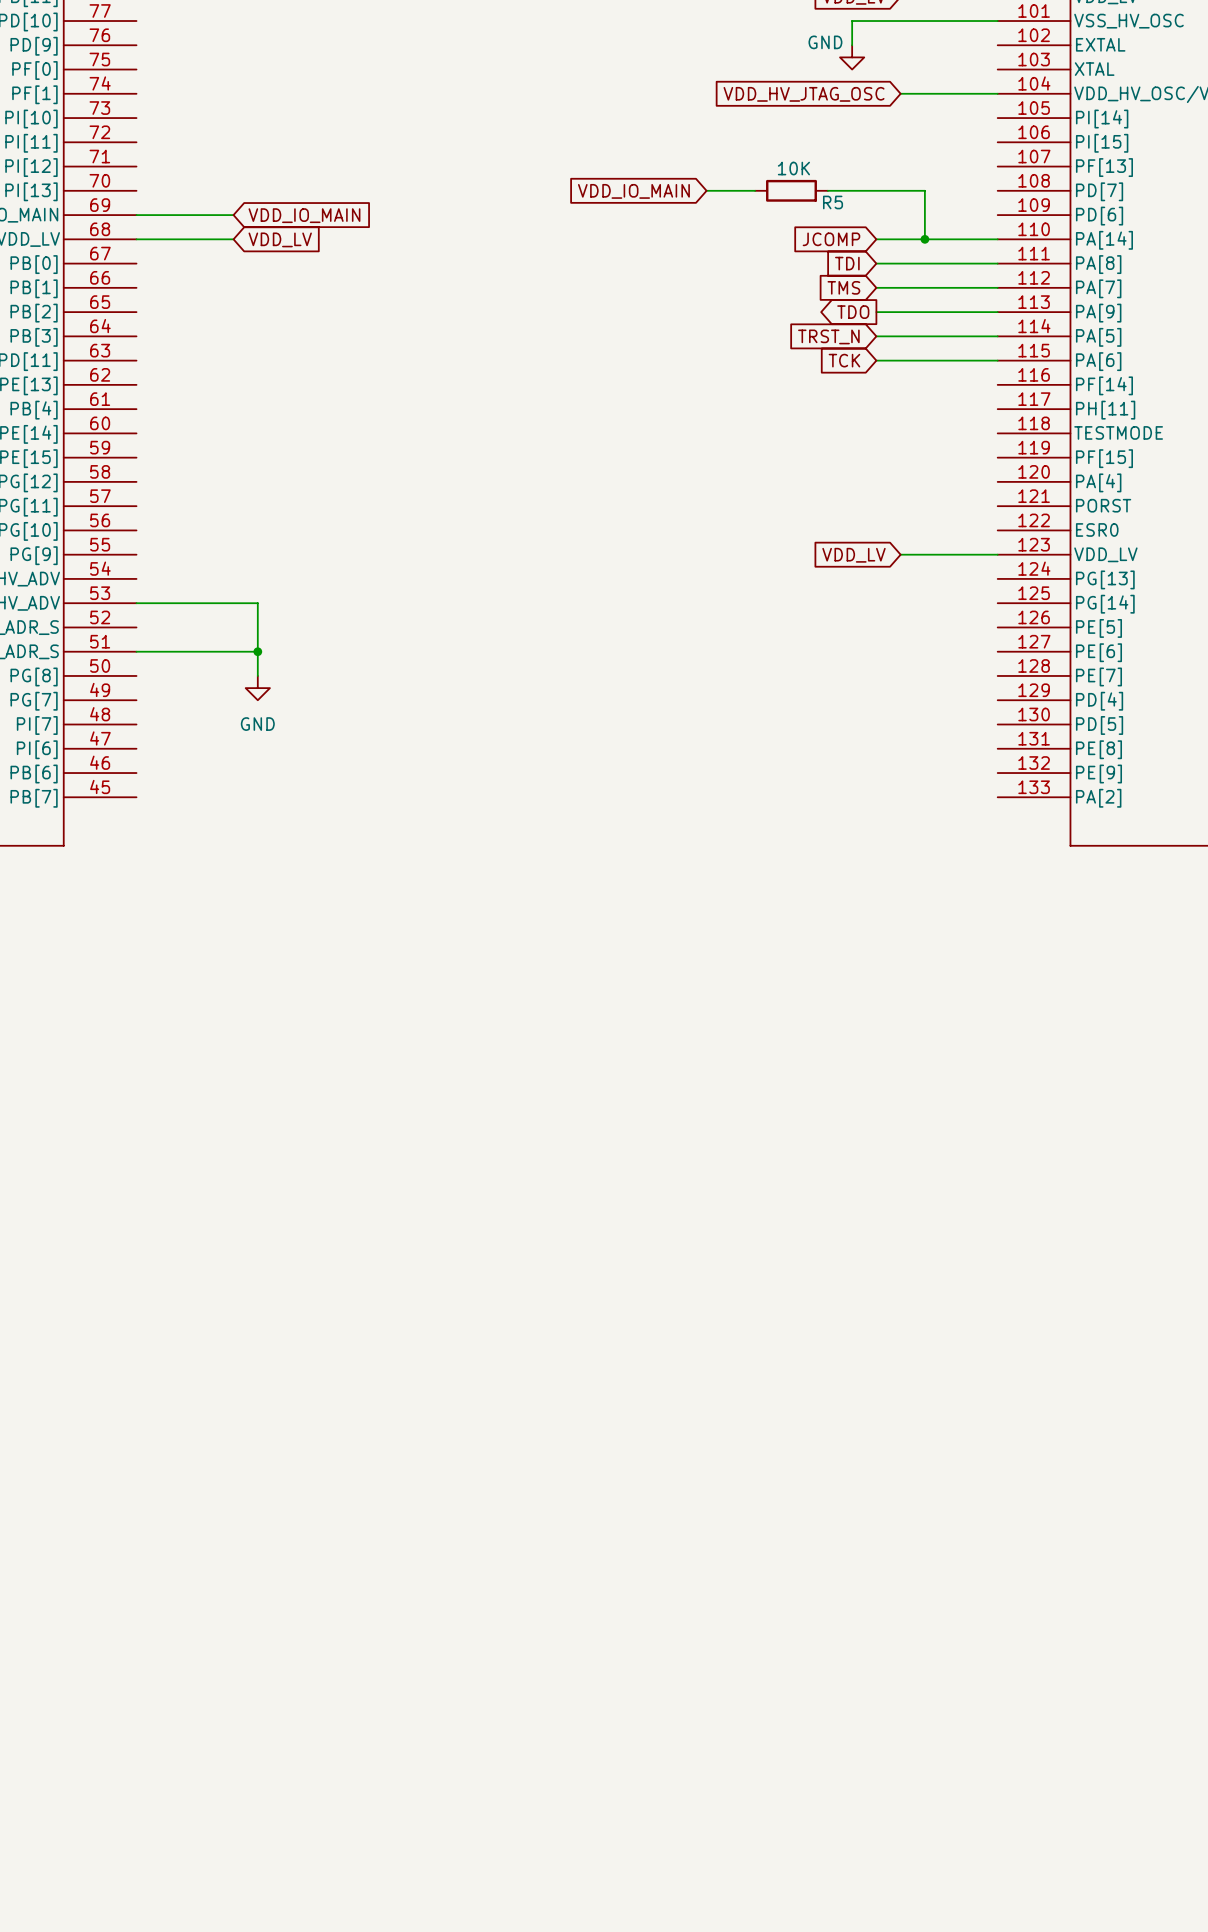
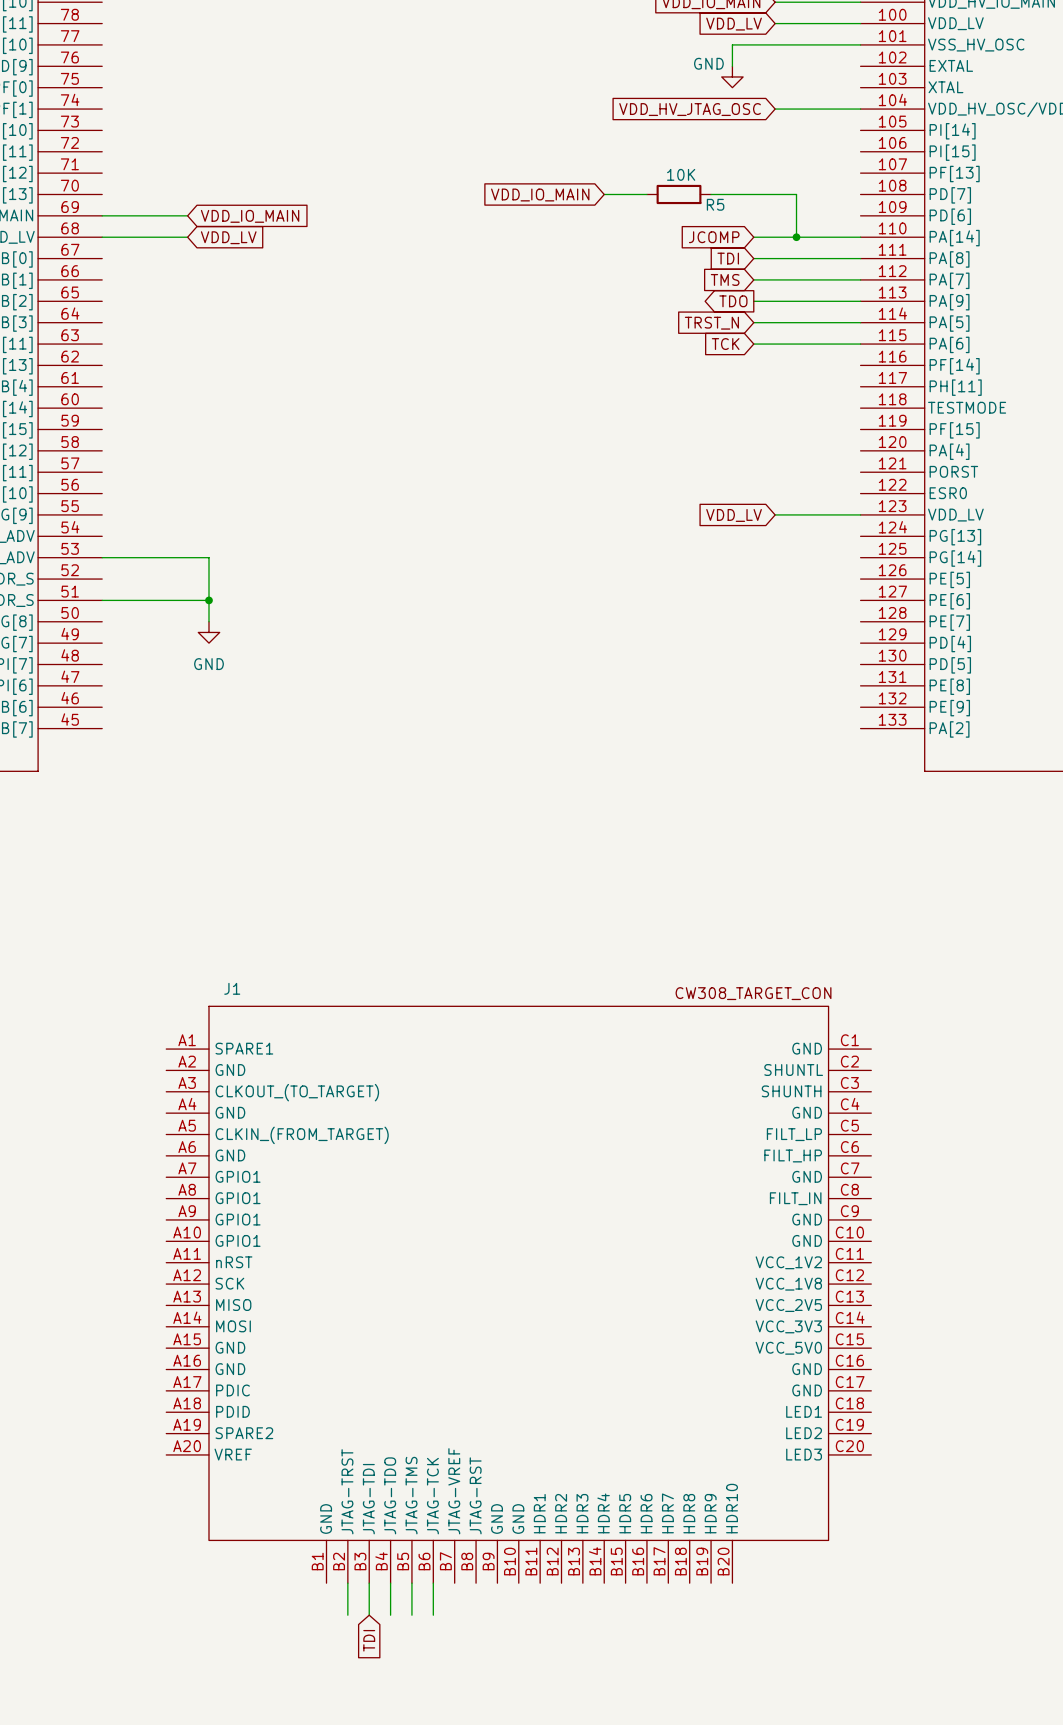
J1: none -> (518, 1294)
wire: none -> (347, 1583) (347, 1615)
wire: none -> (369, 1583) (369, 1615)
wire: none -> (390, 1583) (390, 1615)
wire: none -> (411, 1583) (411, 1615)
wire: none -> (433, 1583) (433, 1615)
global label: none -> TDI (369, 1640)

